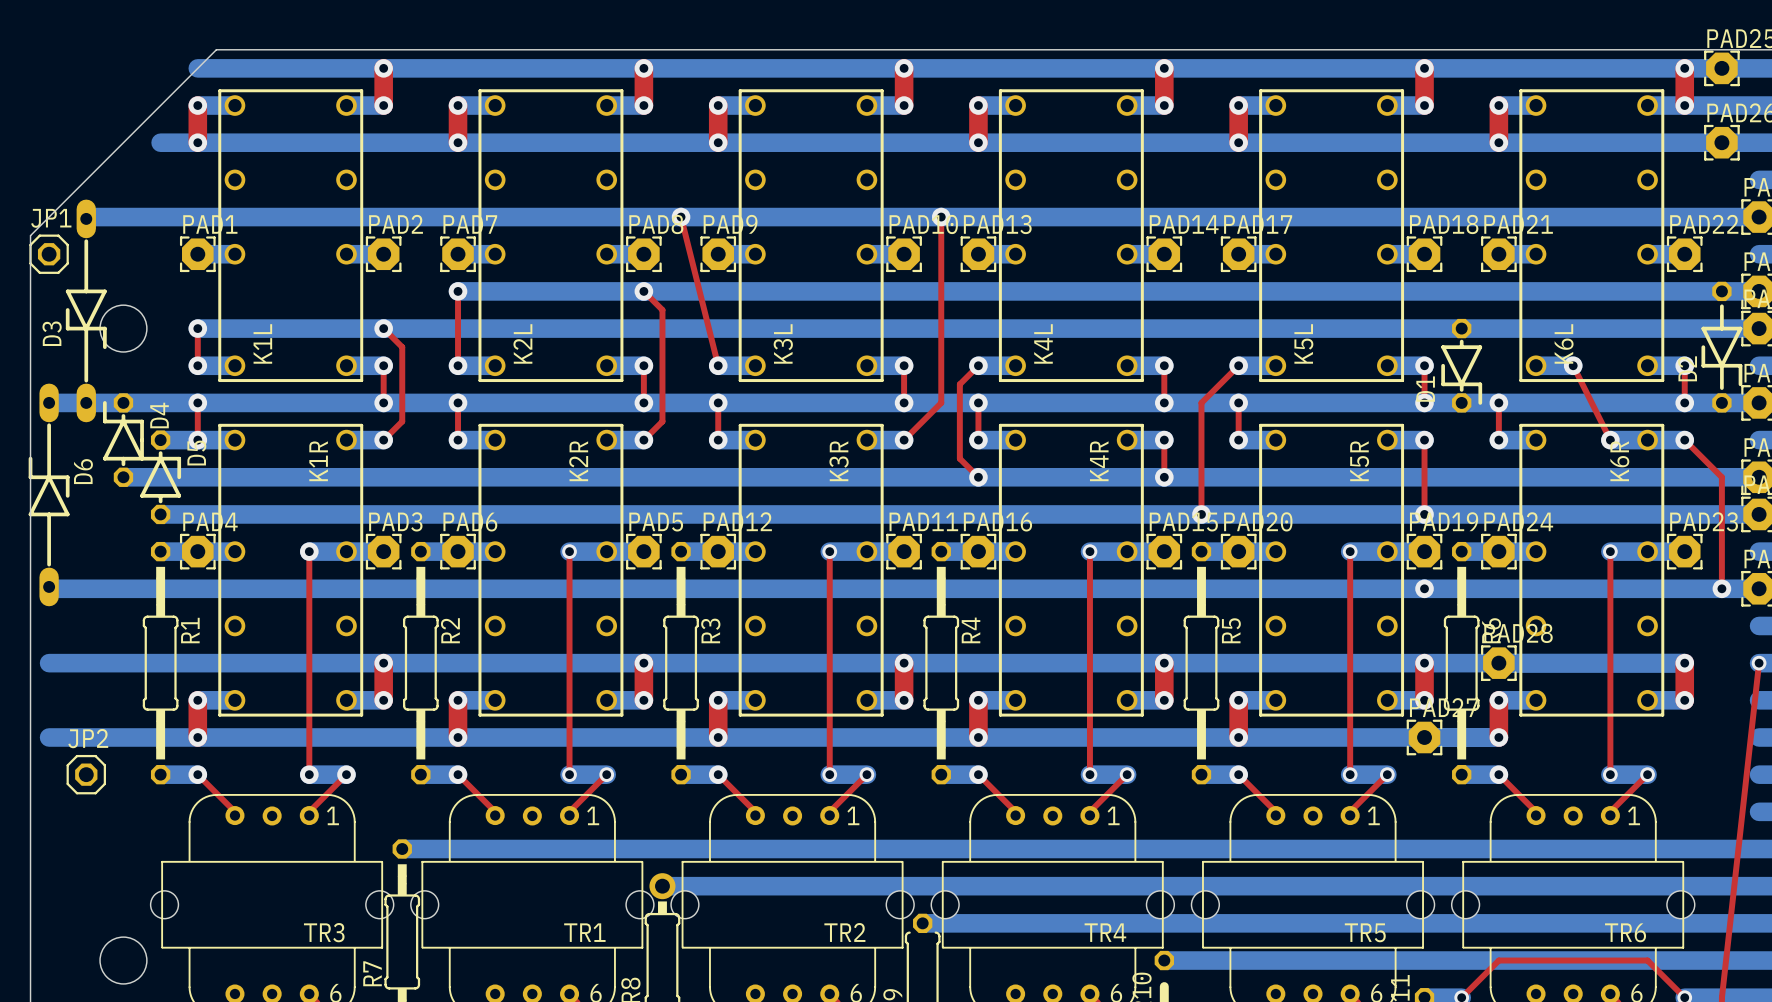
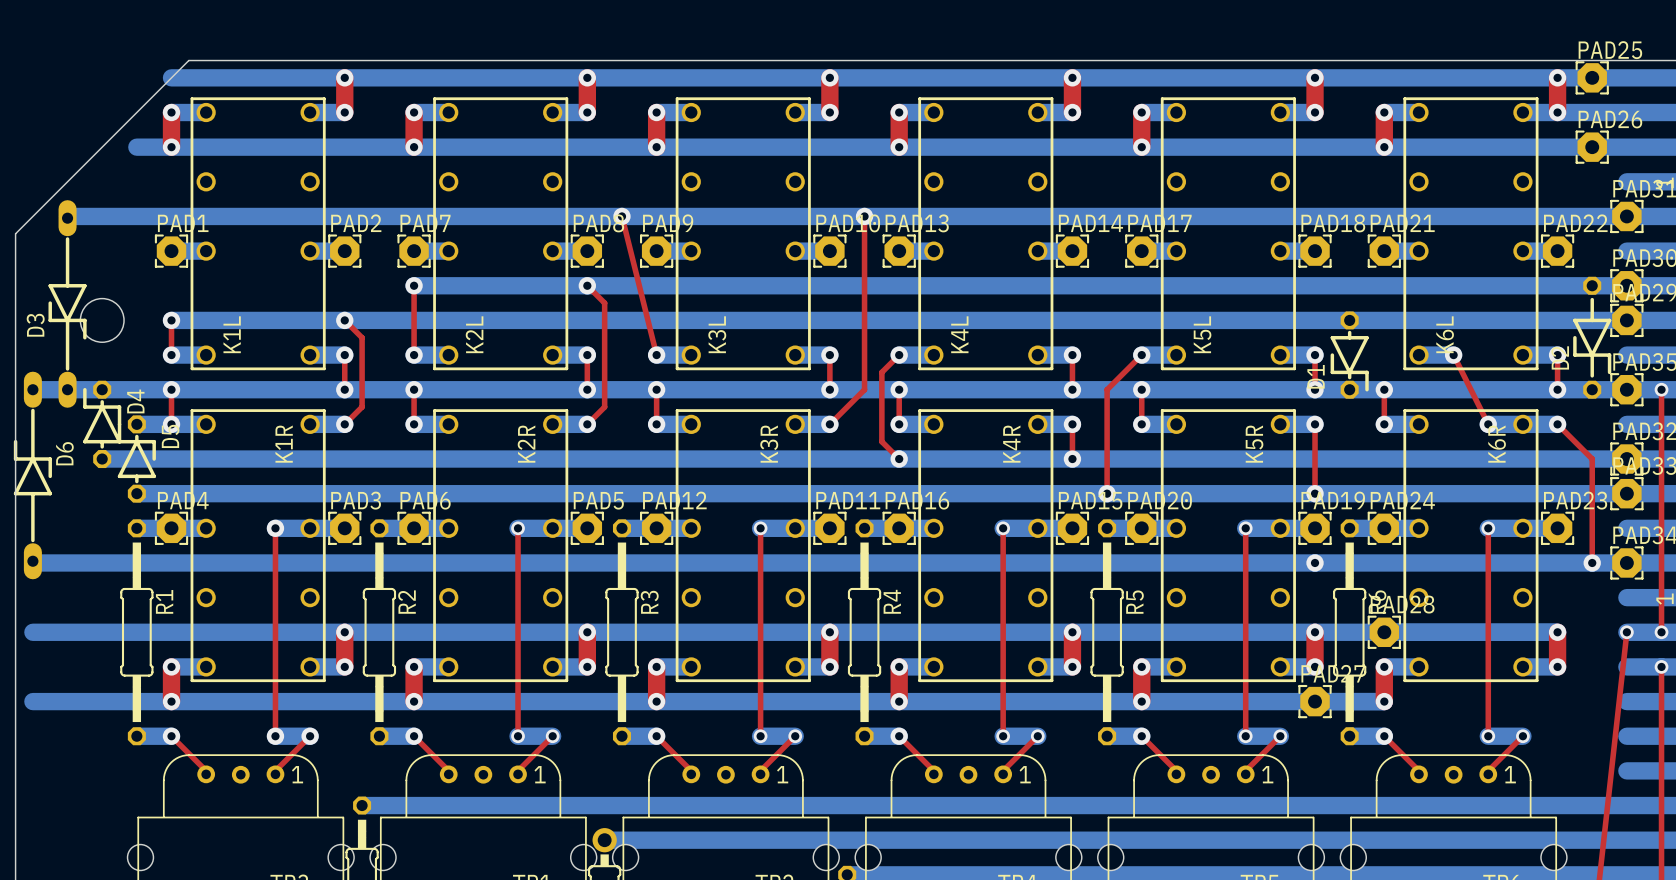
JP1: (49, 254) -> none
JP2: (86, 774) -> none

